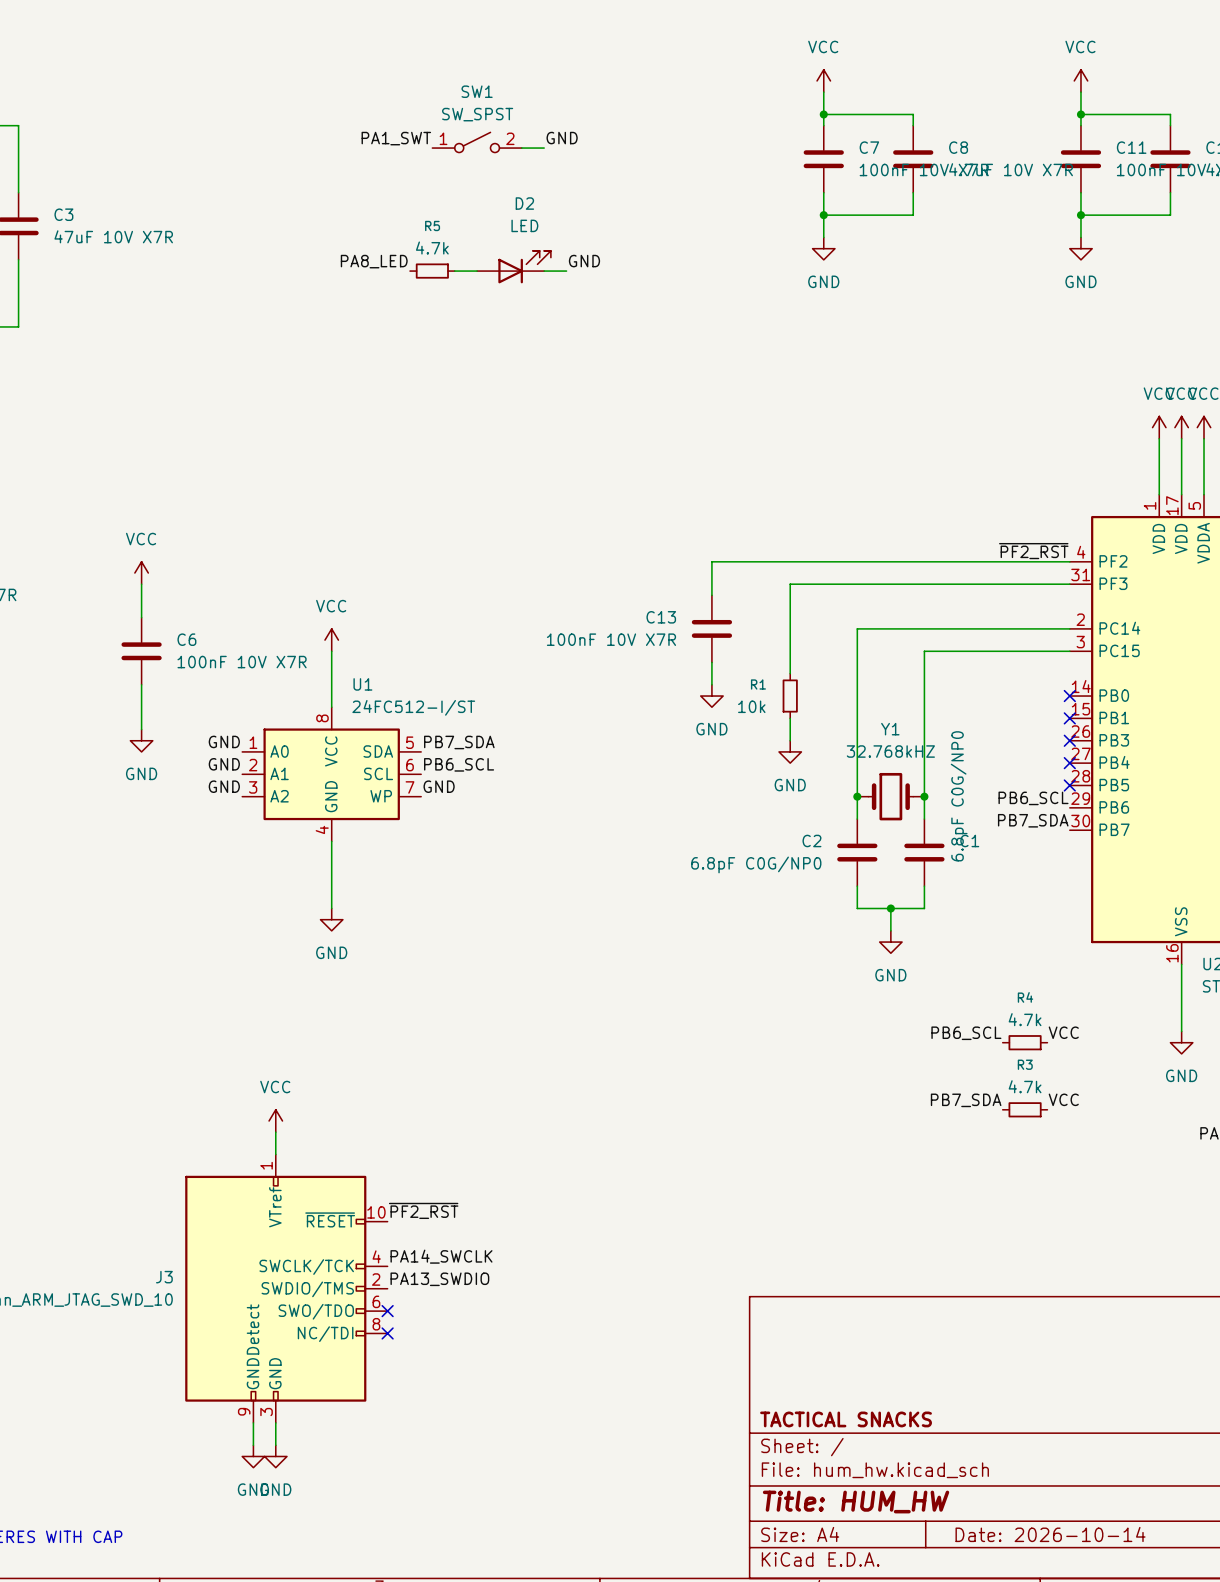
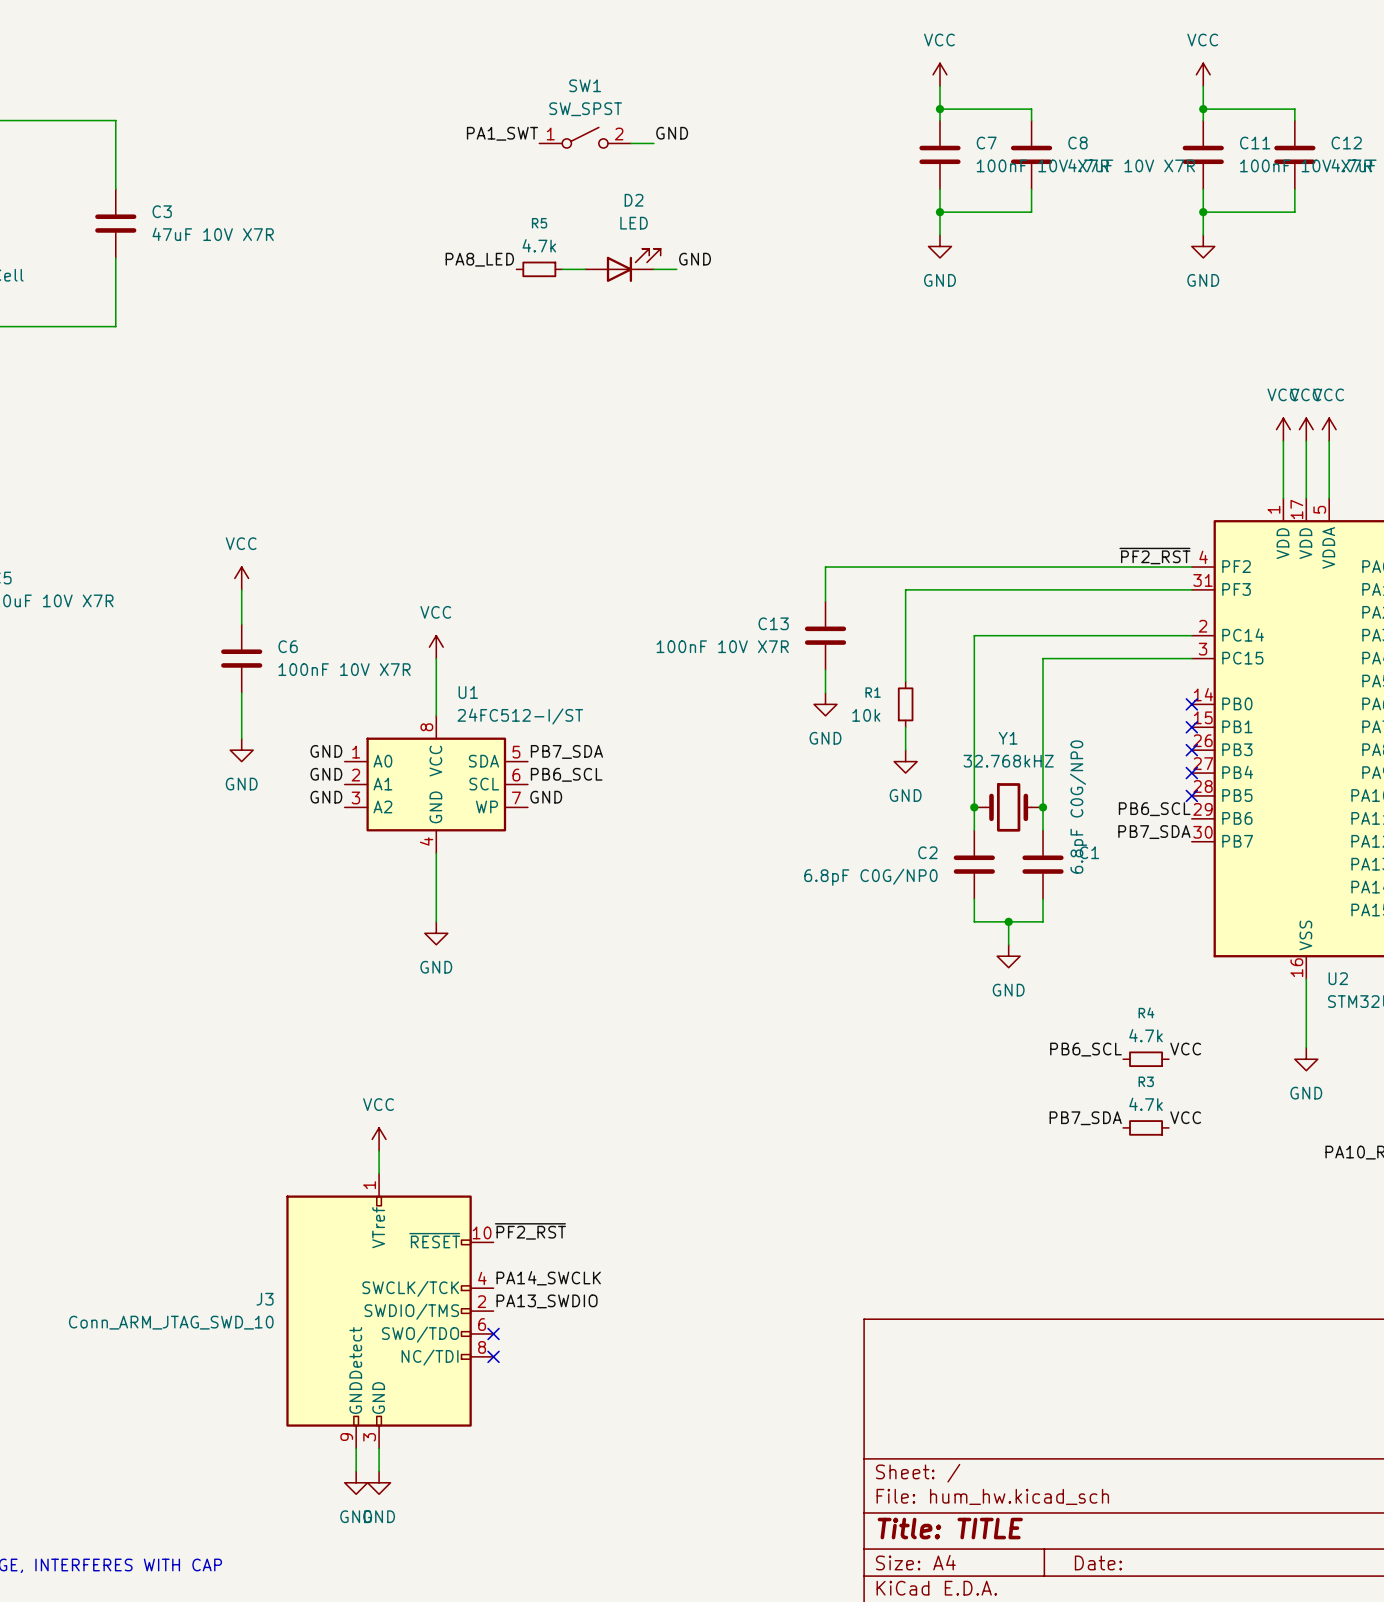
title block: TACTICAL SNACKS (846, 1419) -> none
title block: Title: HUM_HW (856, 1502) -> Title: TITLE (950, 1528)
title block: Date: 2026-10-14 (1050, 1534) -> Date: (1098, 1562)

